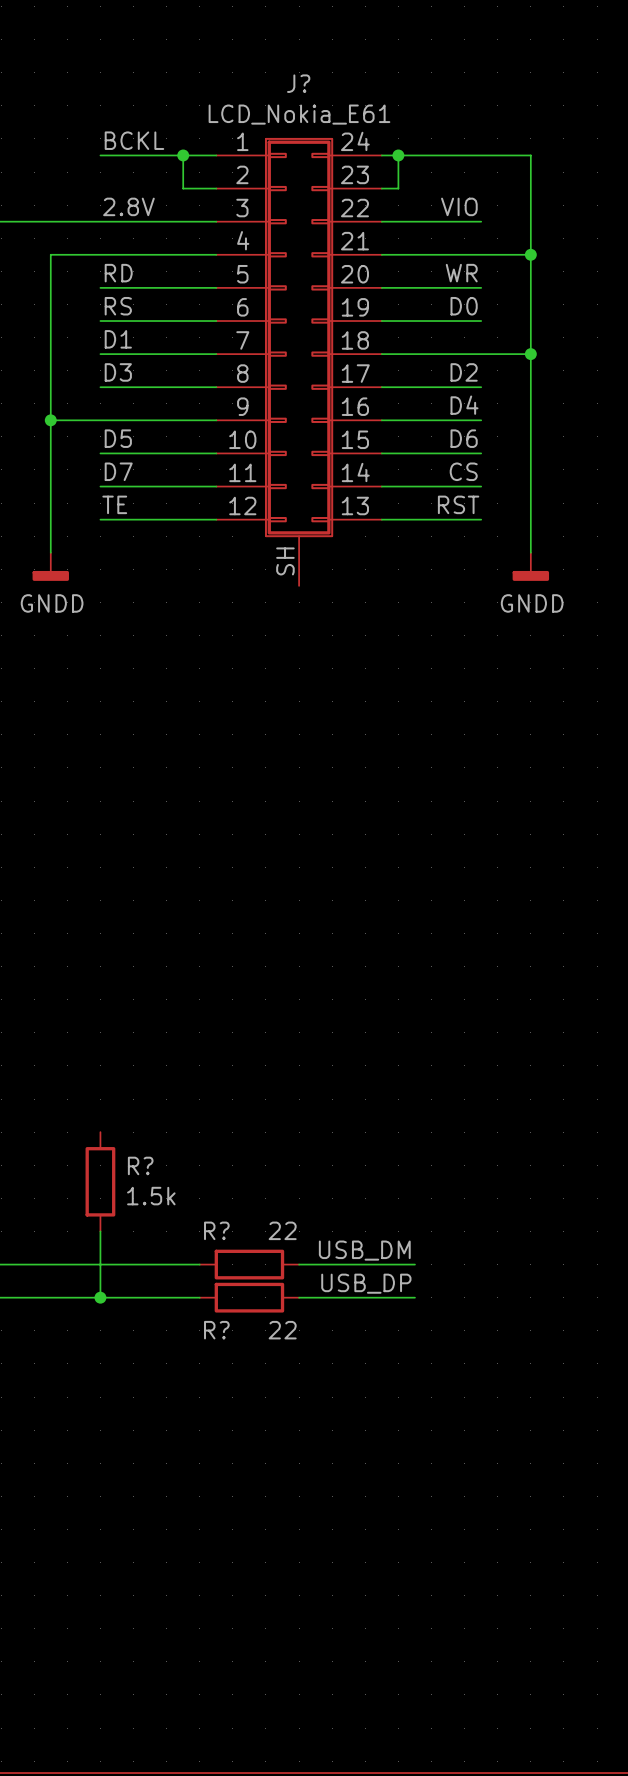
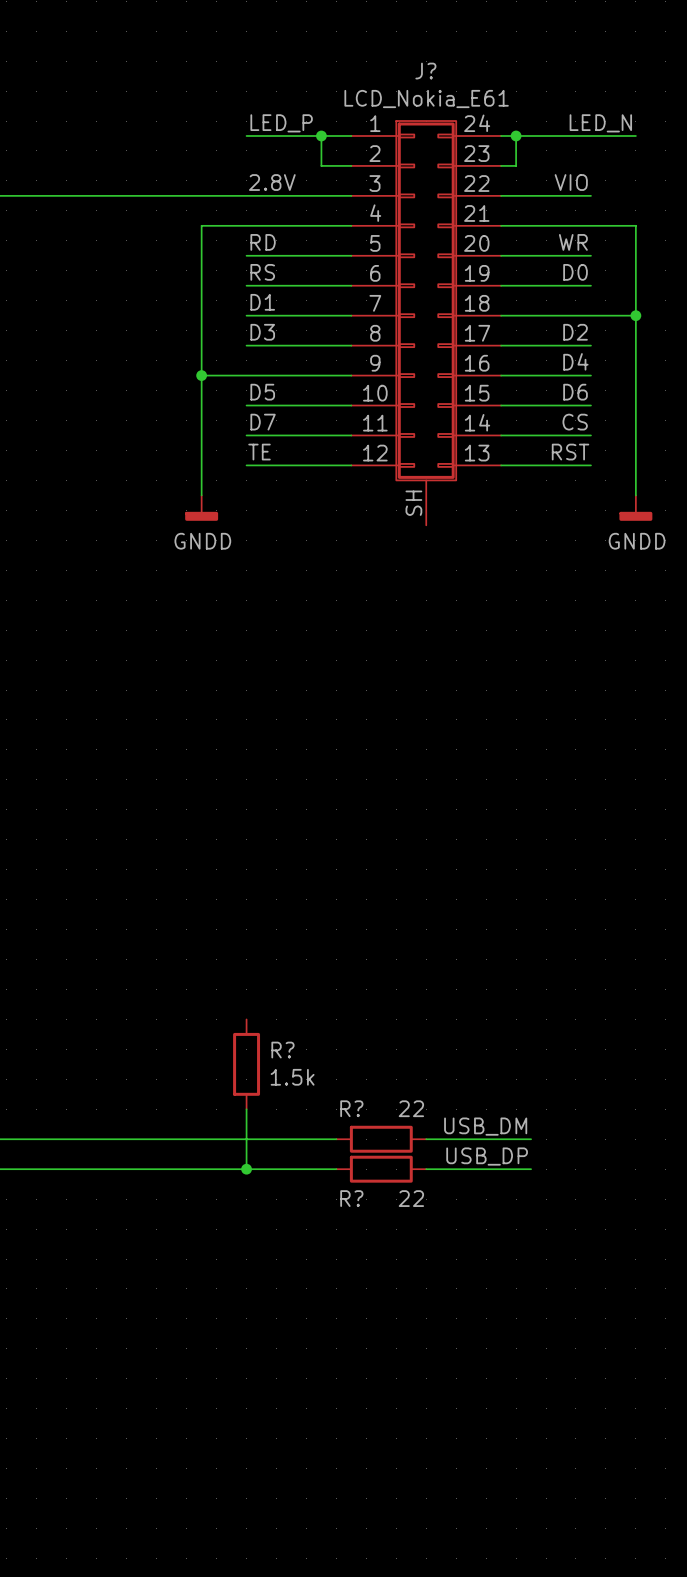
label: BCKL (134, 140) -> LED_P (281, 123)
label: none -> LED_N (600, 123)
wire: (530, 155) (530, 254) -> none
junction: (530, 254) -> none

